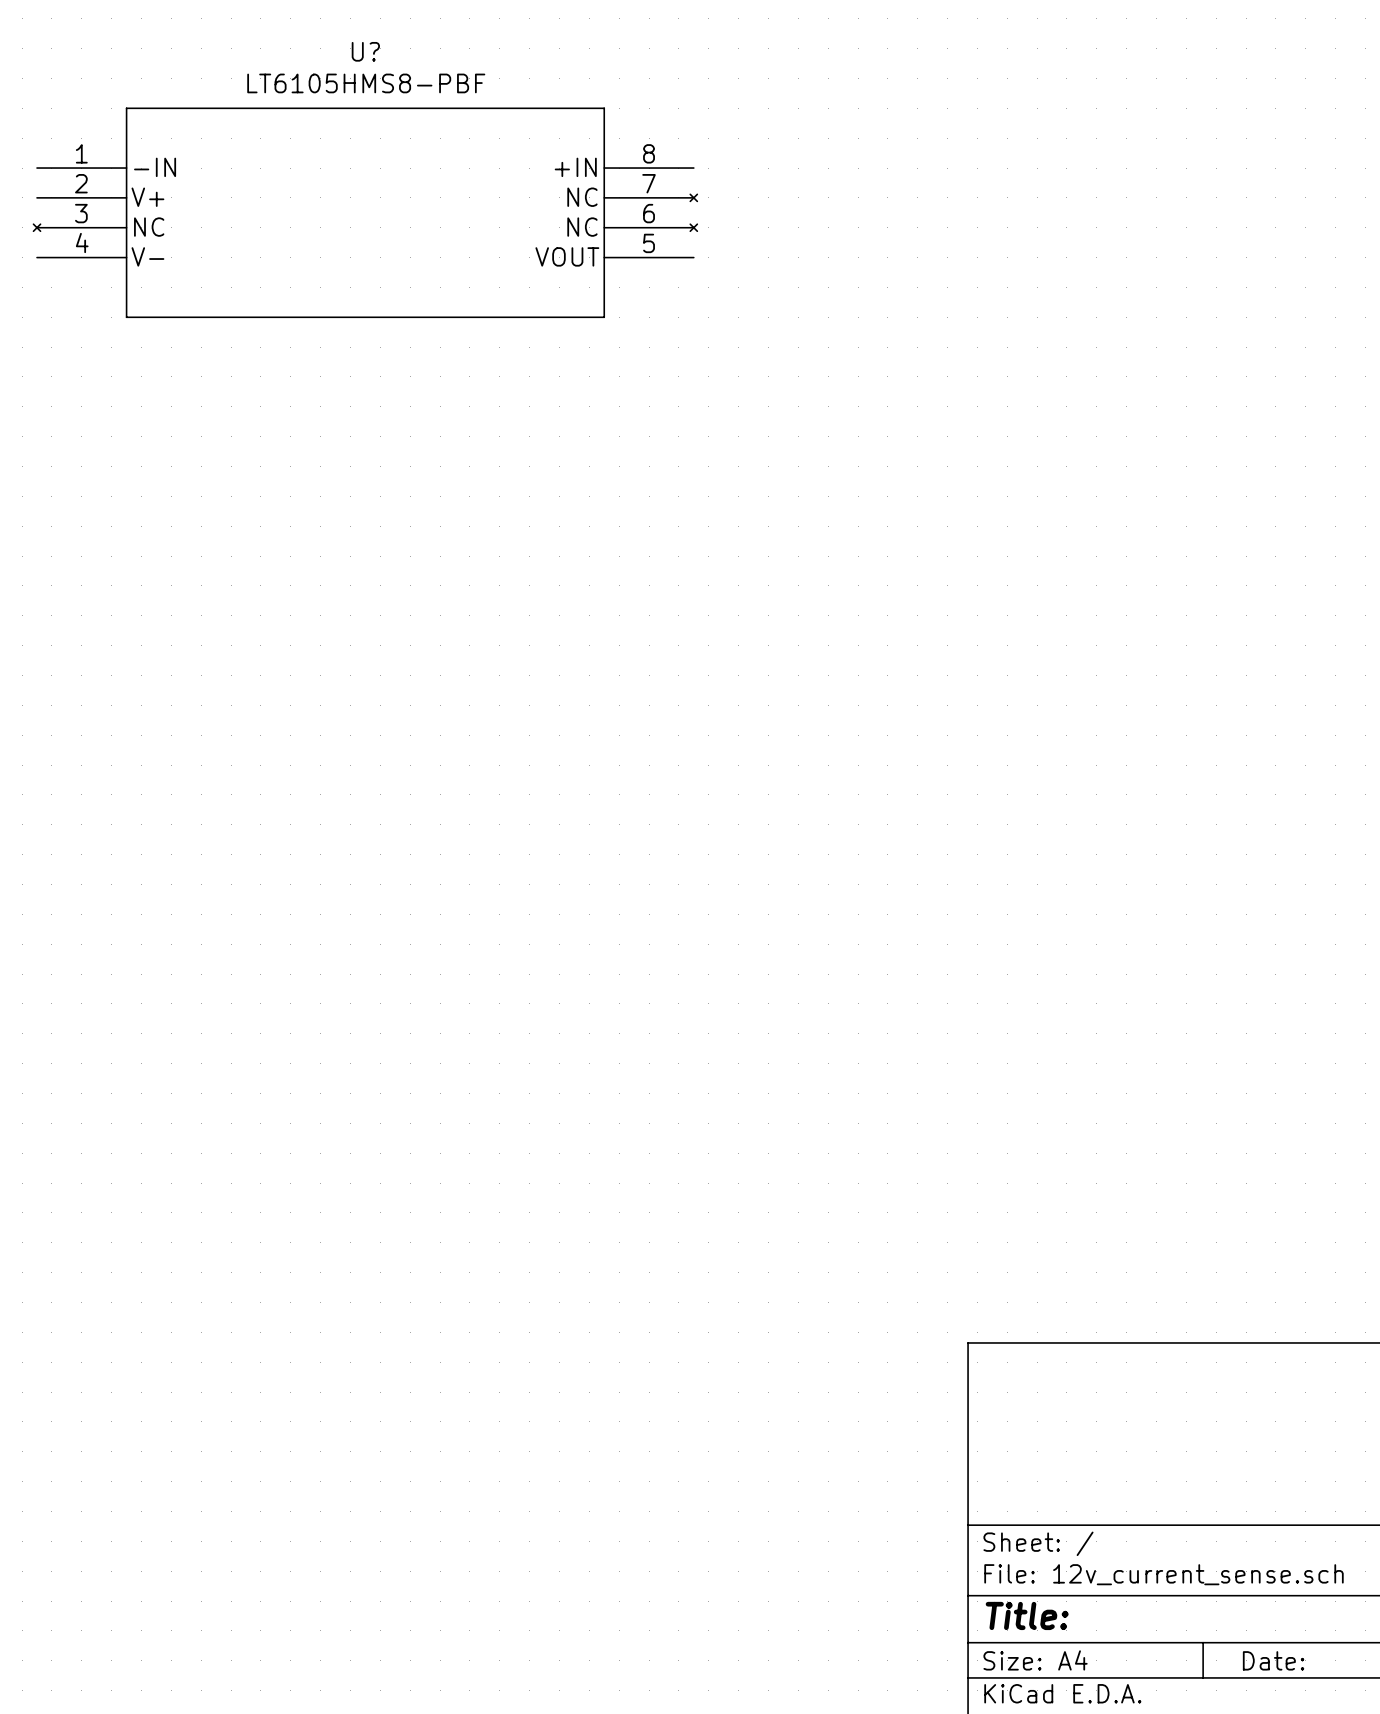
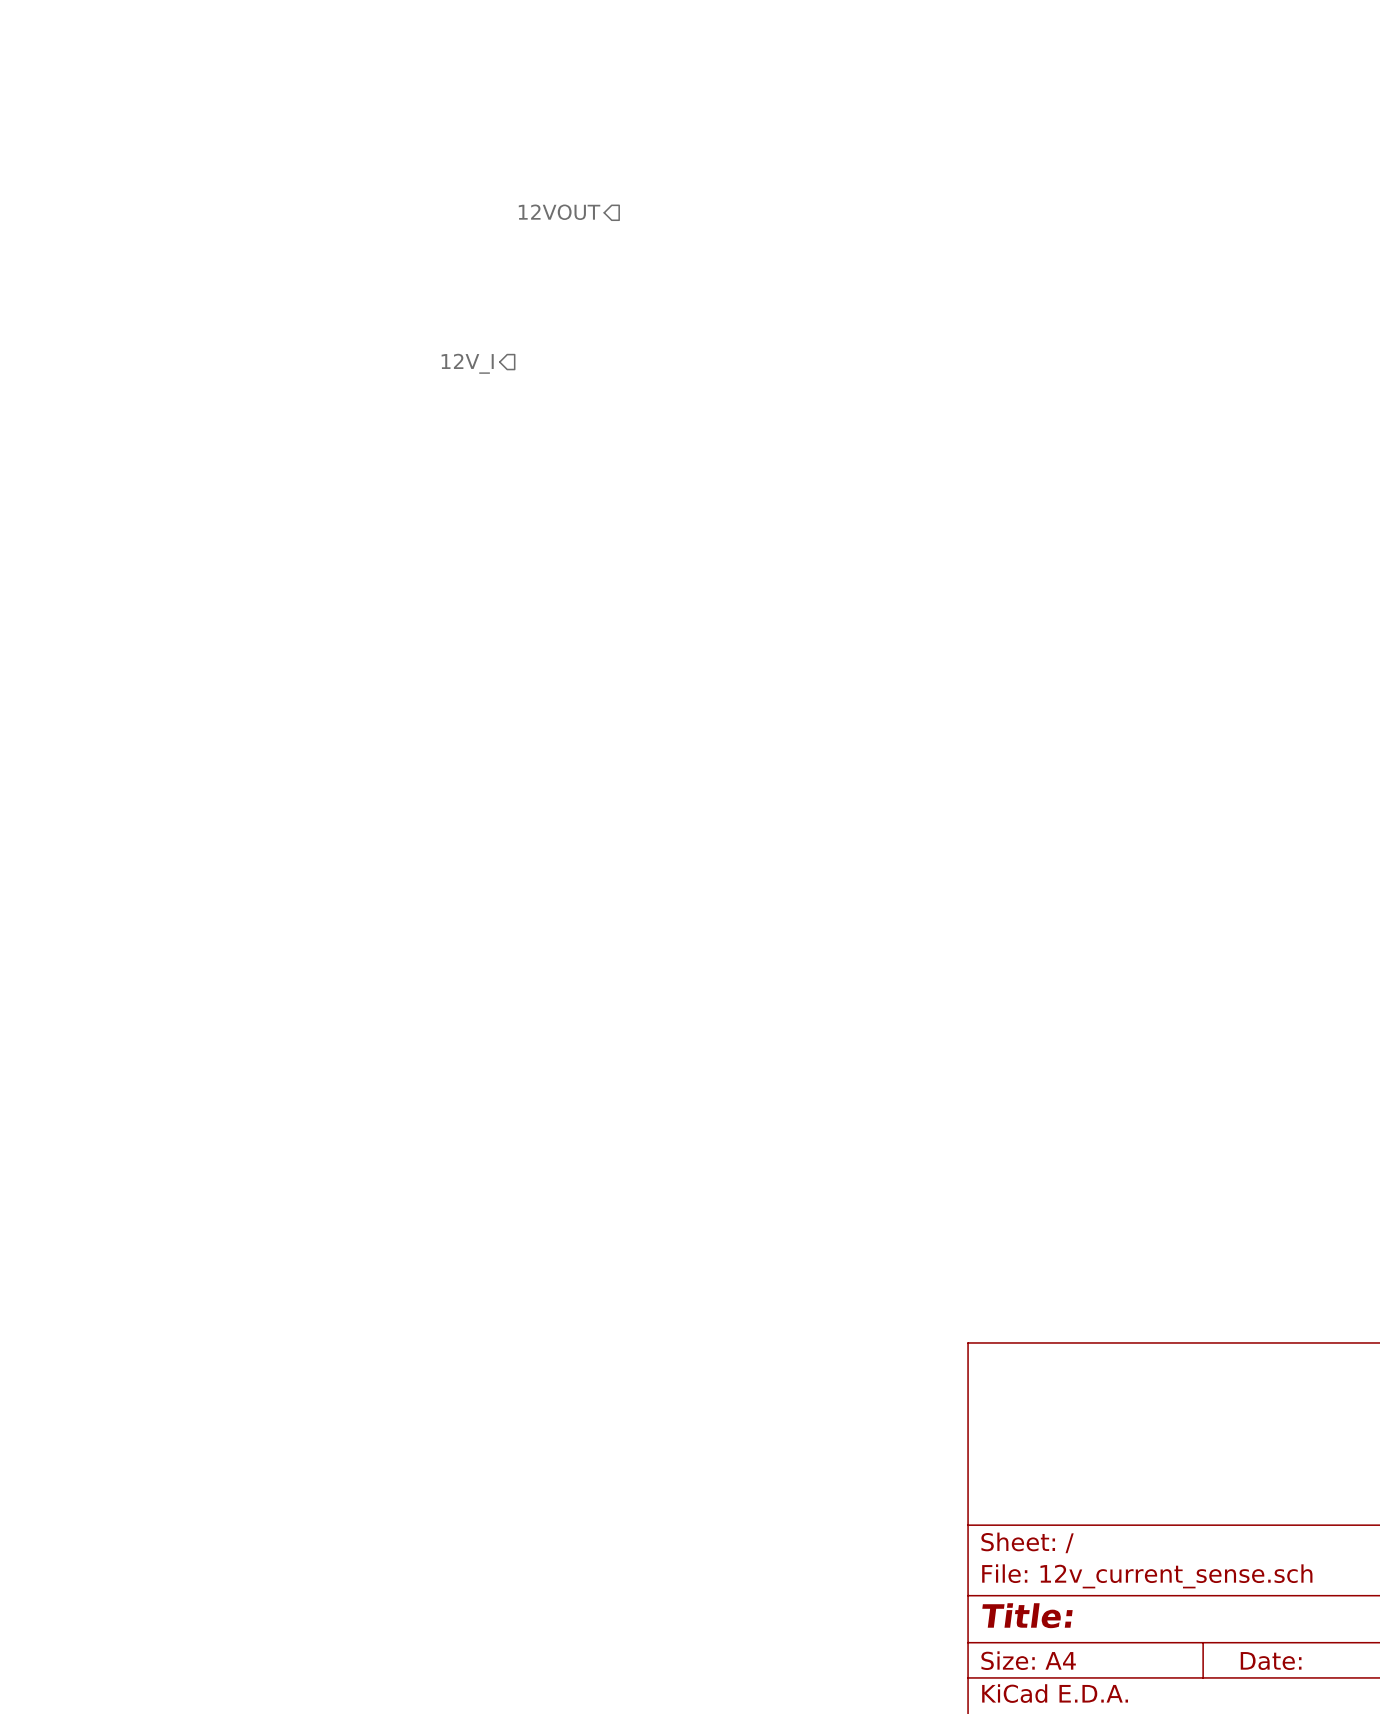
U?: LT6105HMS8-PBF (365, 212) -> none
hierarchical label: none -> 12VOUT (559, 212)
hierarchical label: none -> 12V_I (467, 363)

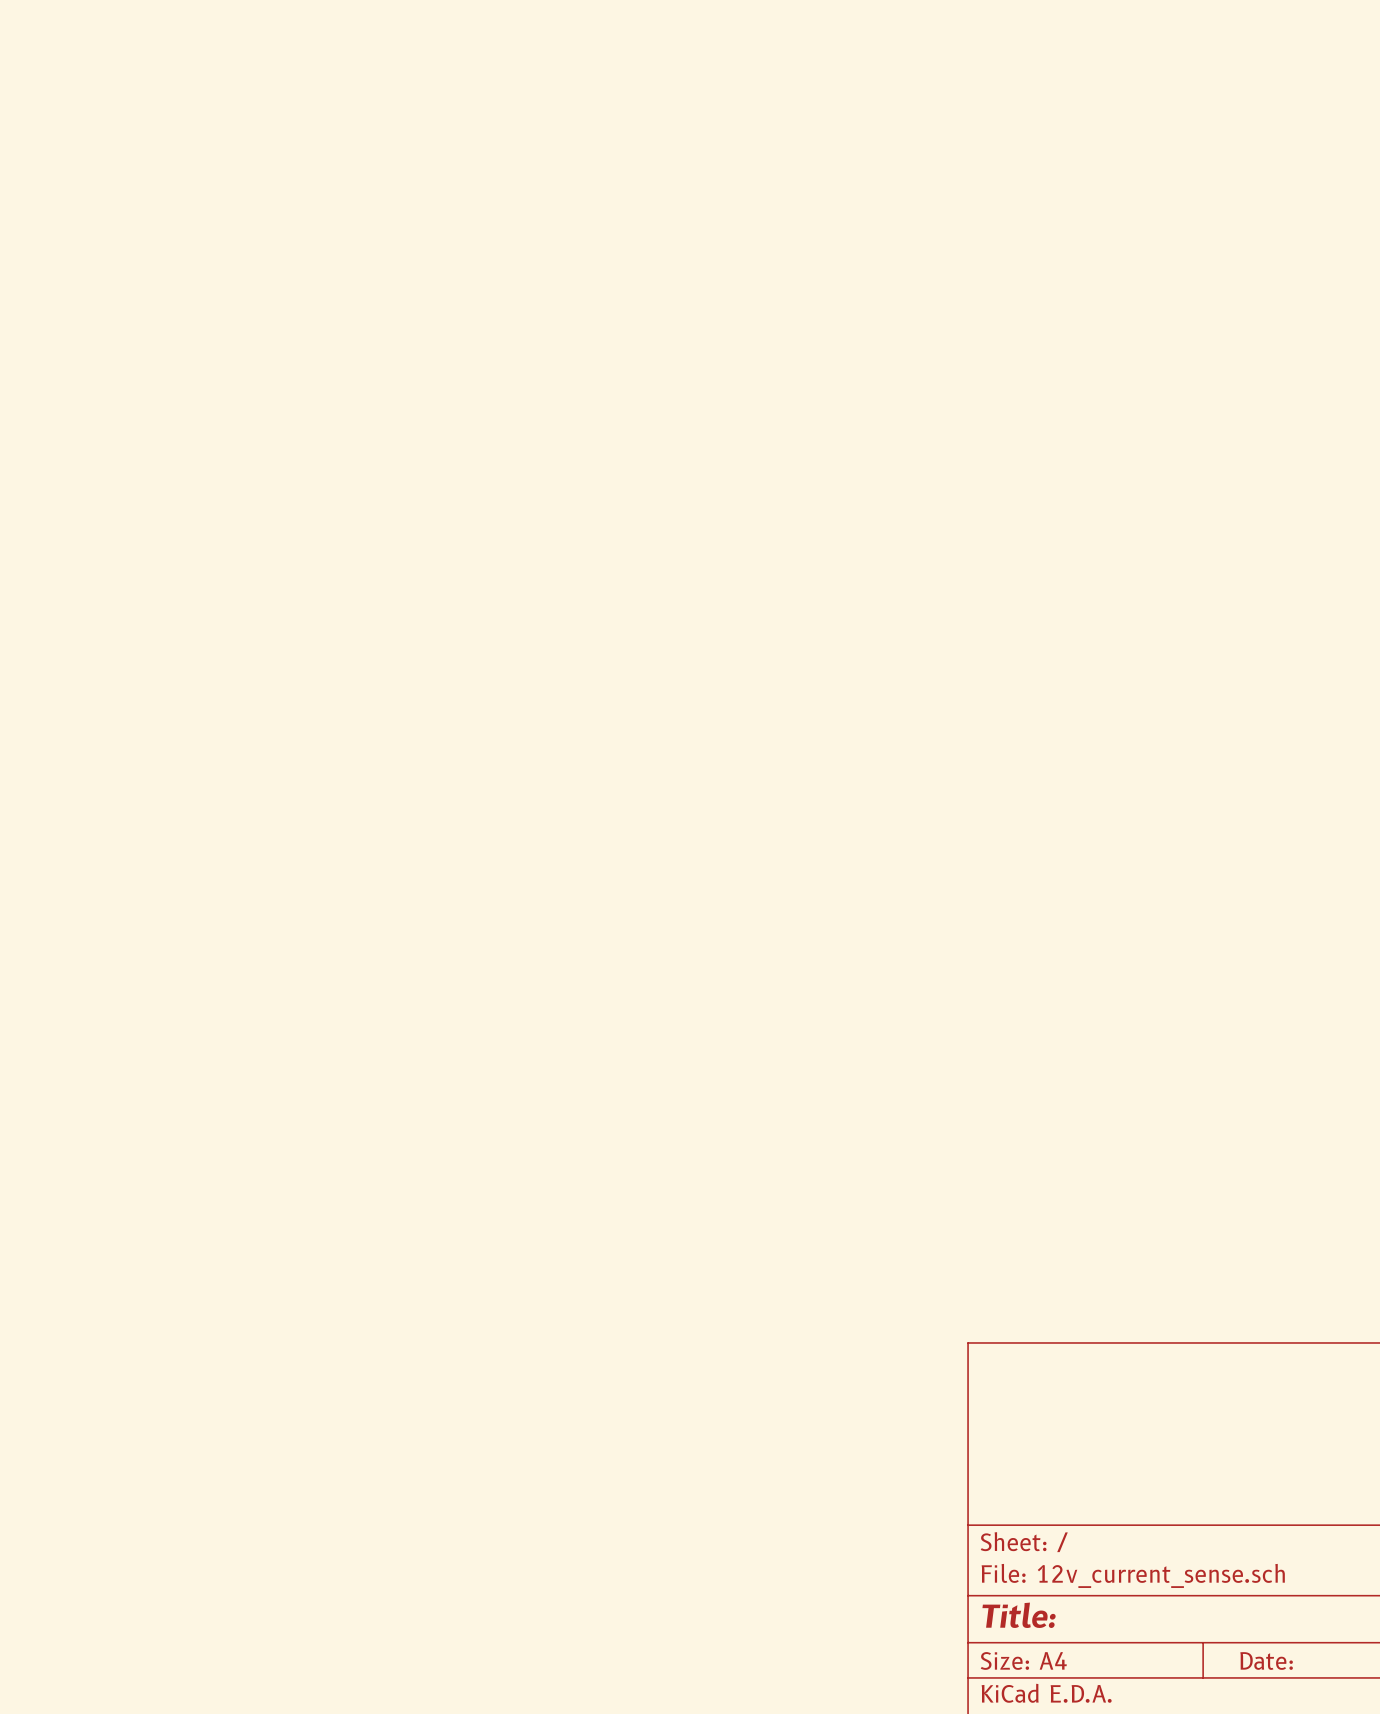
hierarchical label: 12VOUT (559, 212) -> none
hierarchical label: 12V_I (467, 363) -> none

